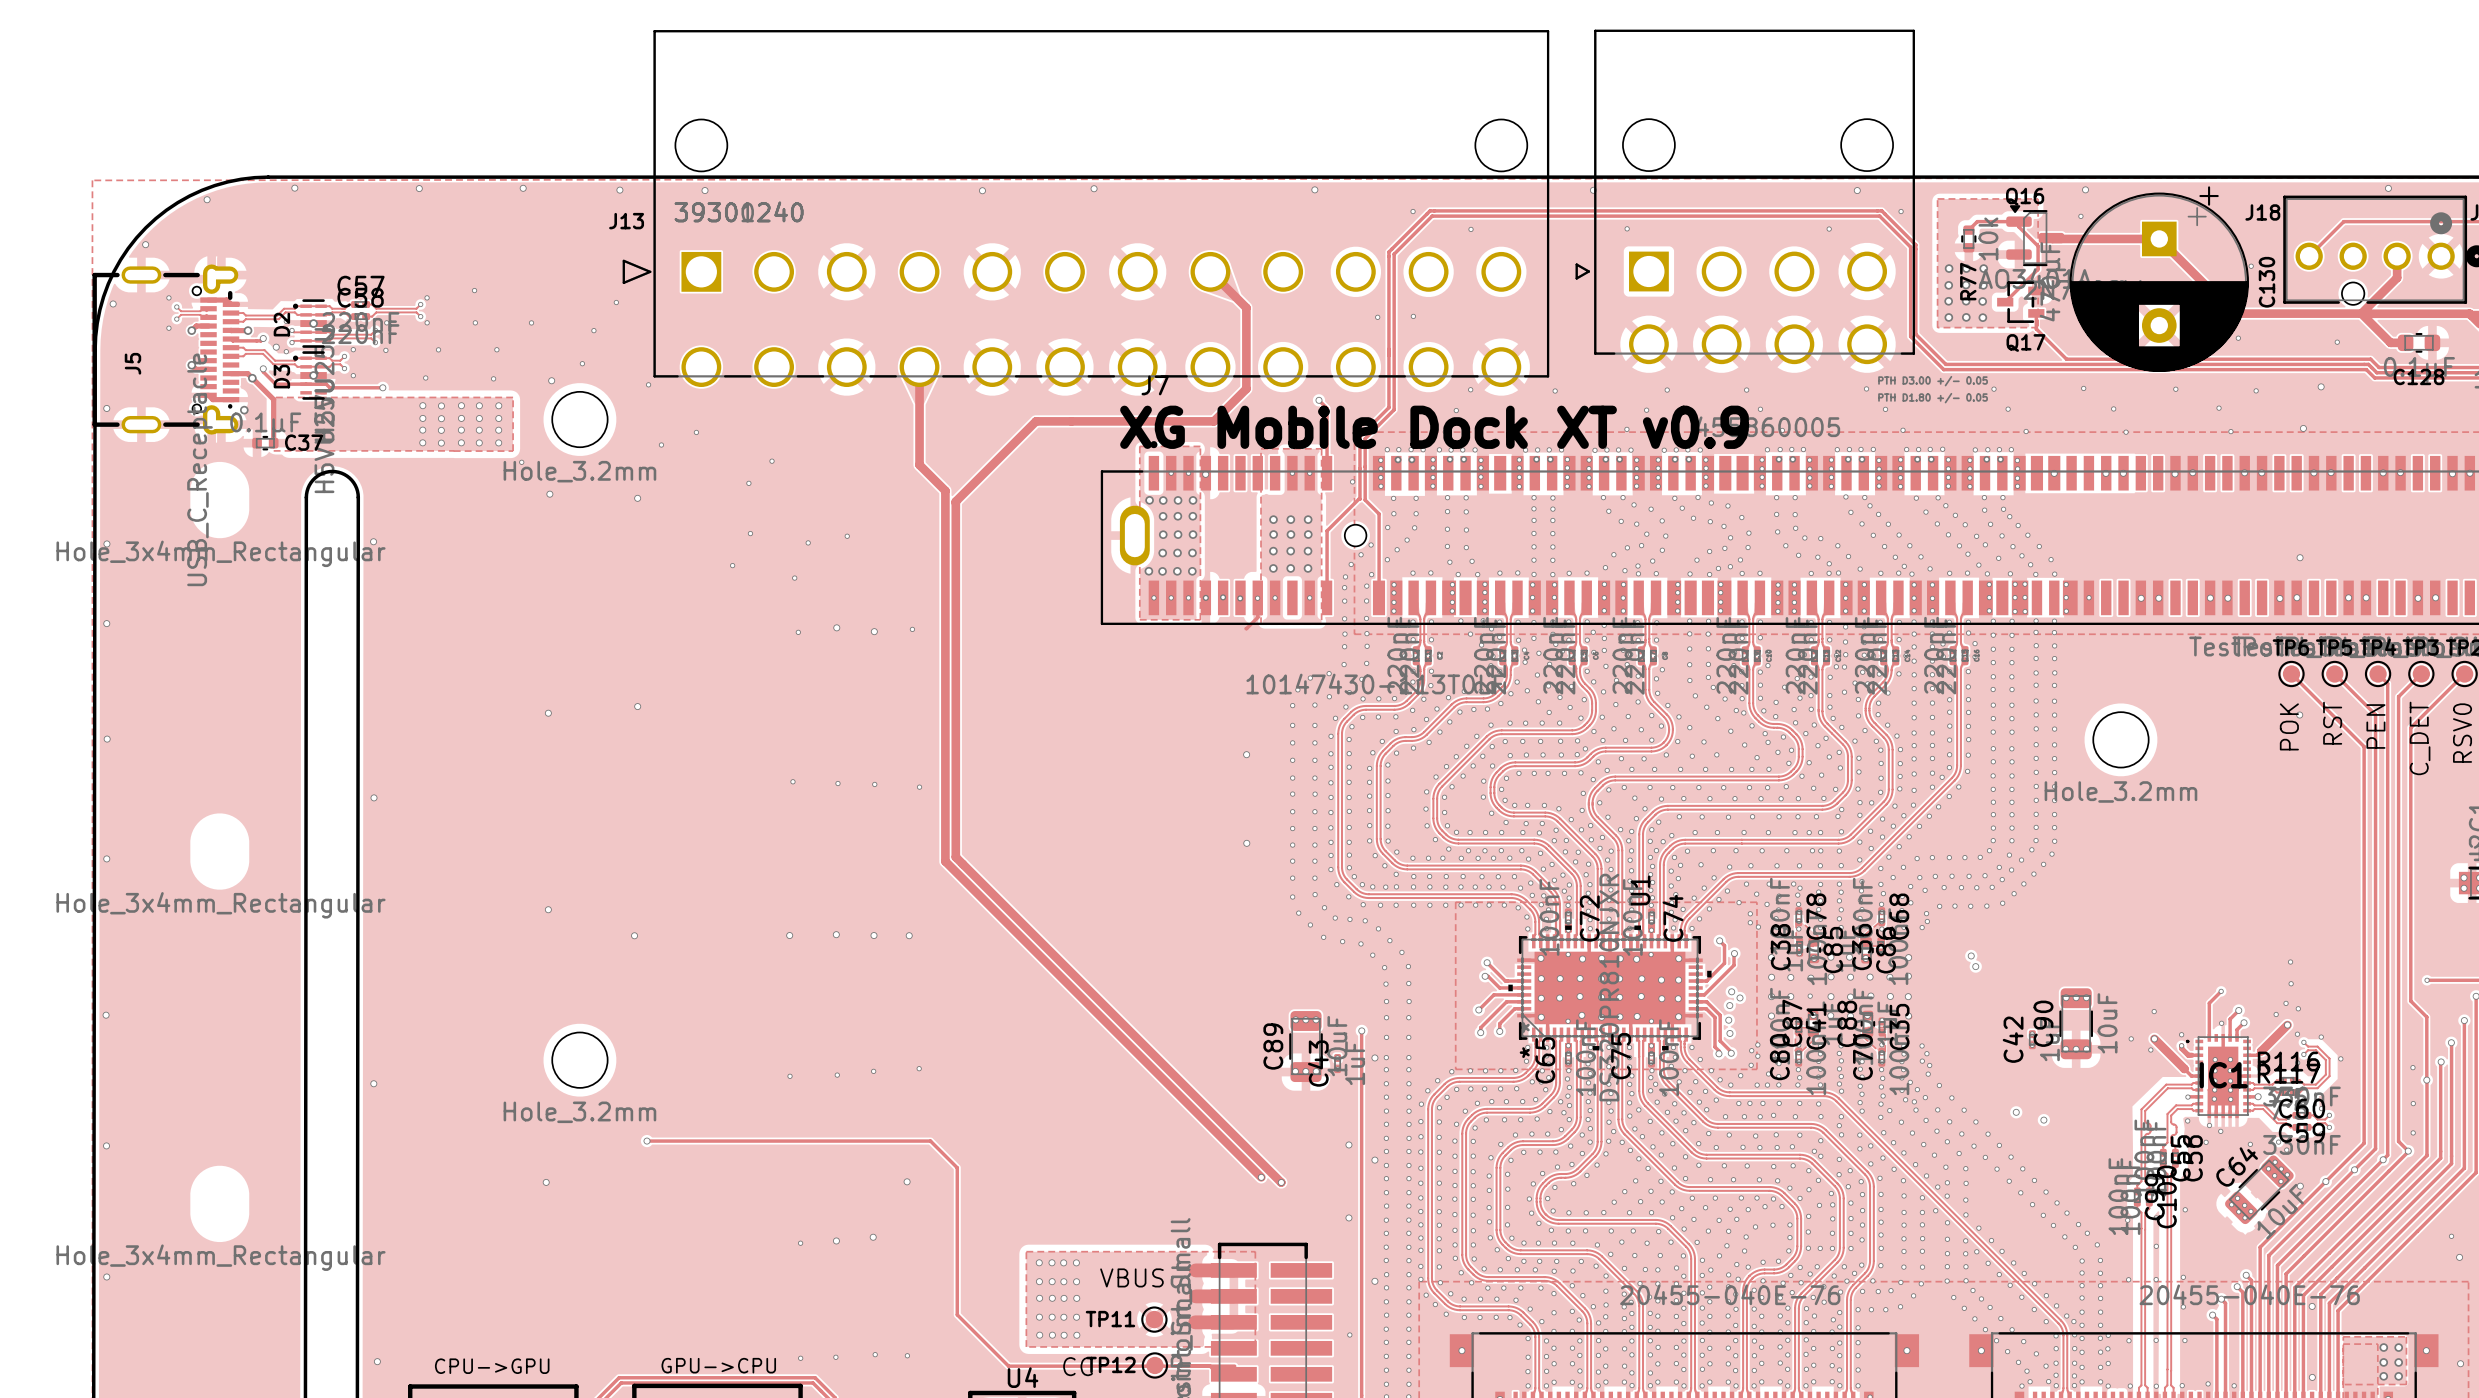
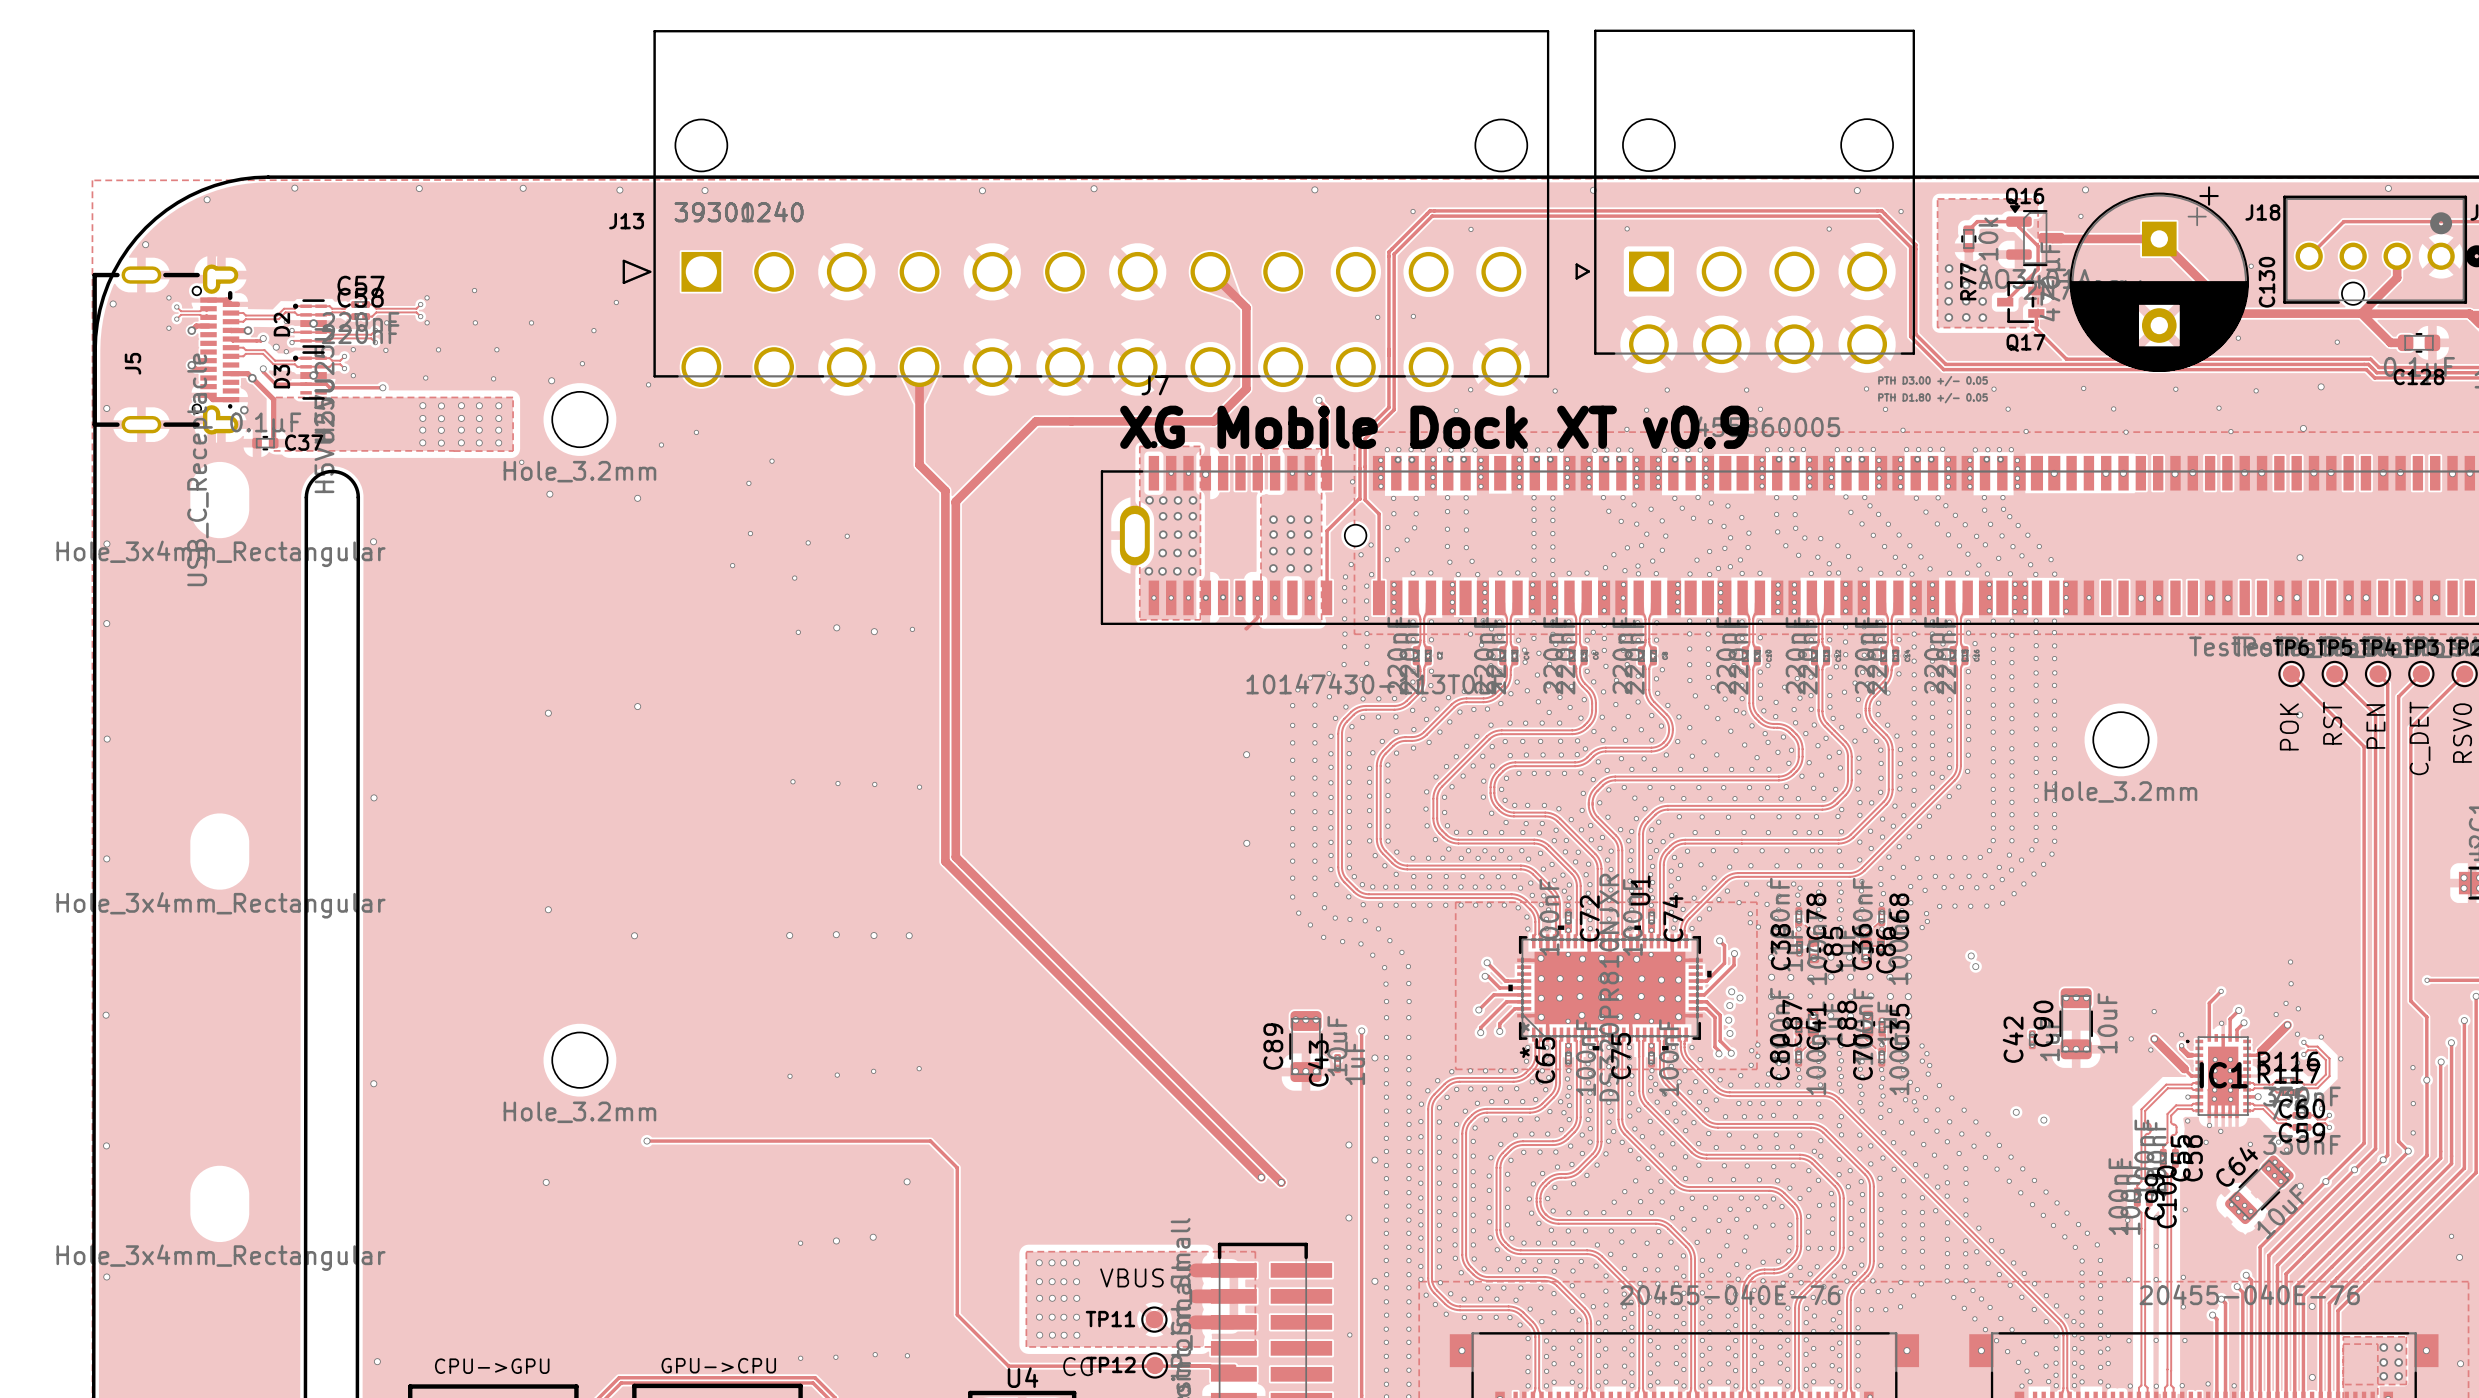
U1 footprint: [1508, 925, 1712, 1051] -> [1508, 925, 1712, 1051]

